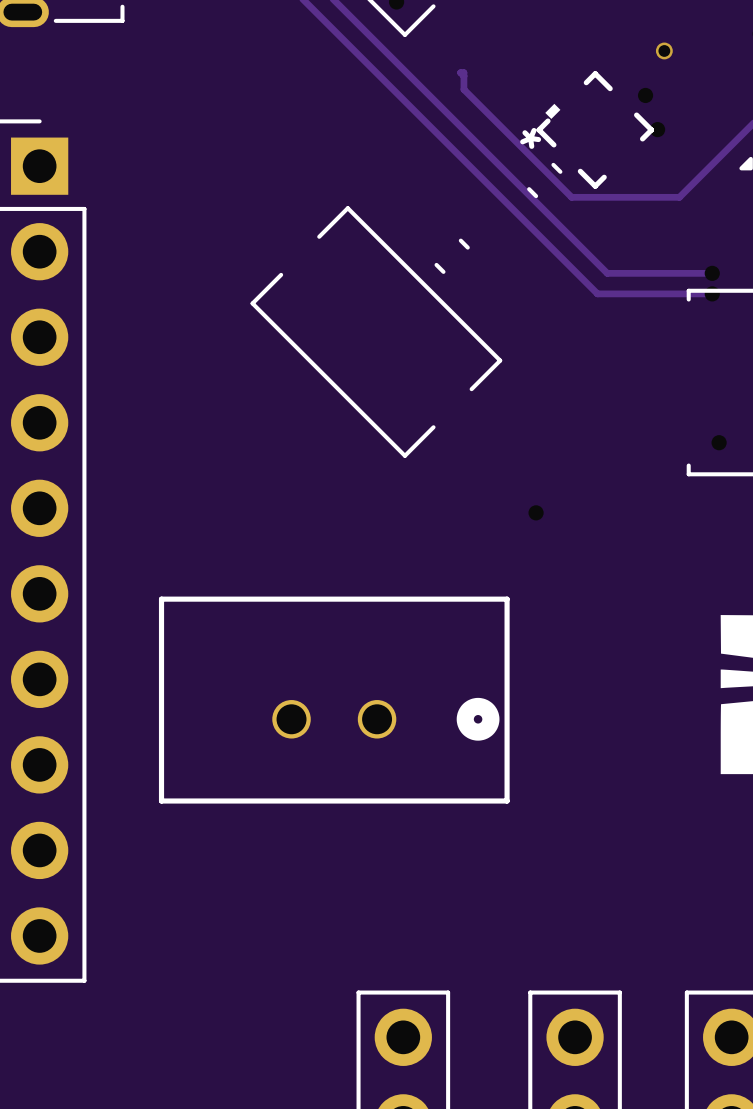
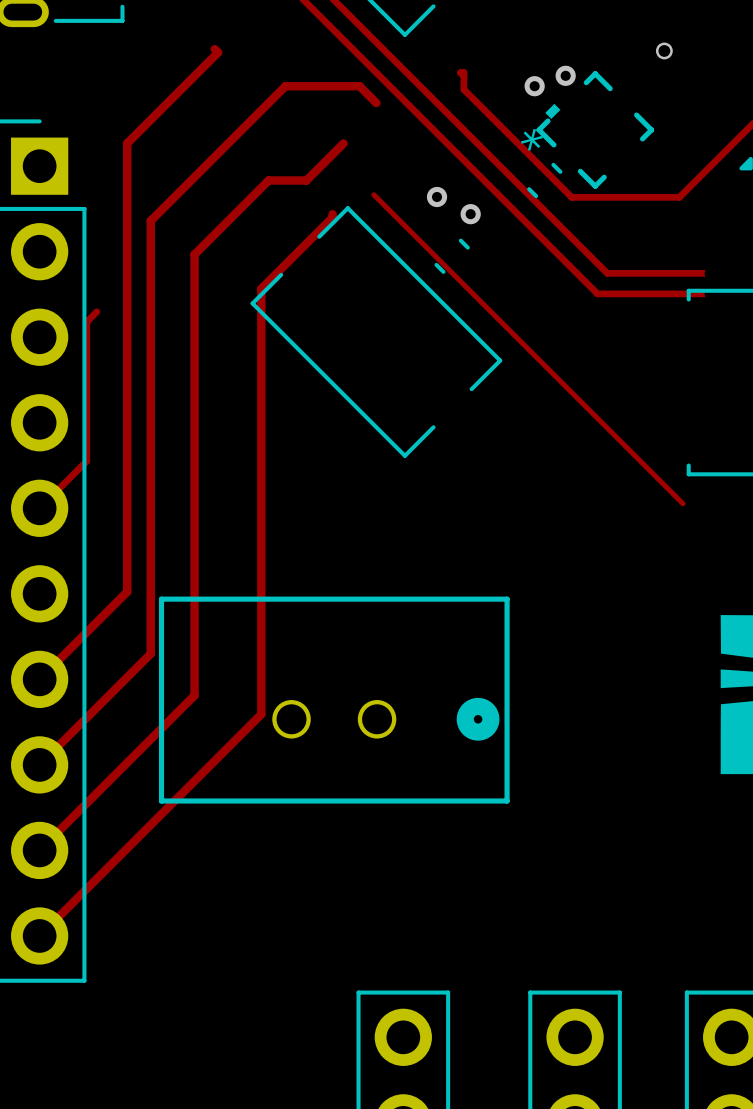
track: none -> (214, 49) (218, 52) (127, 143) (127, 591) (39, 679)
via: none -> (565, 75)
via: none -> (534, 86)
track: none -> (376, 103) (359, 86) (285, 86) (150, 220) (150, 653) (39, 764)
track: none -> (343, 143) (306, 180) (268, 180) (194, 254) (194, 695) (39, 850)
track: none -> (373, 194) (683, 503)
via: none -> (437, 197)
track: none -> (332, 214) (332, 217) (261, 288) (261, 714) (39, 935)
via: none -> (470, 214)
track: none -> (96, 311) (86, 321) (86, 461) (39, 508)

